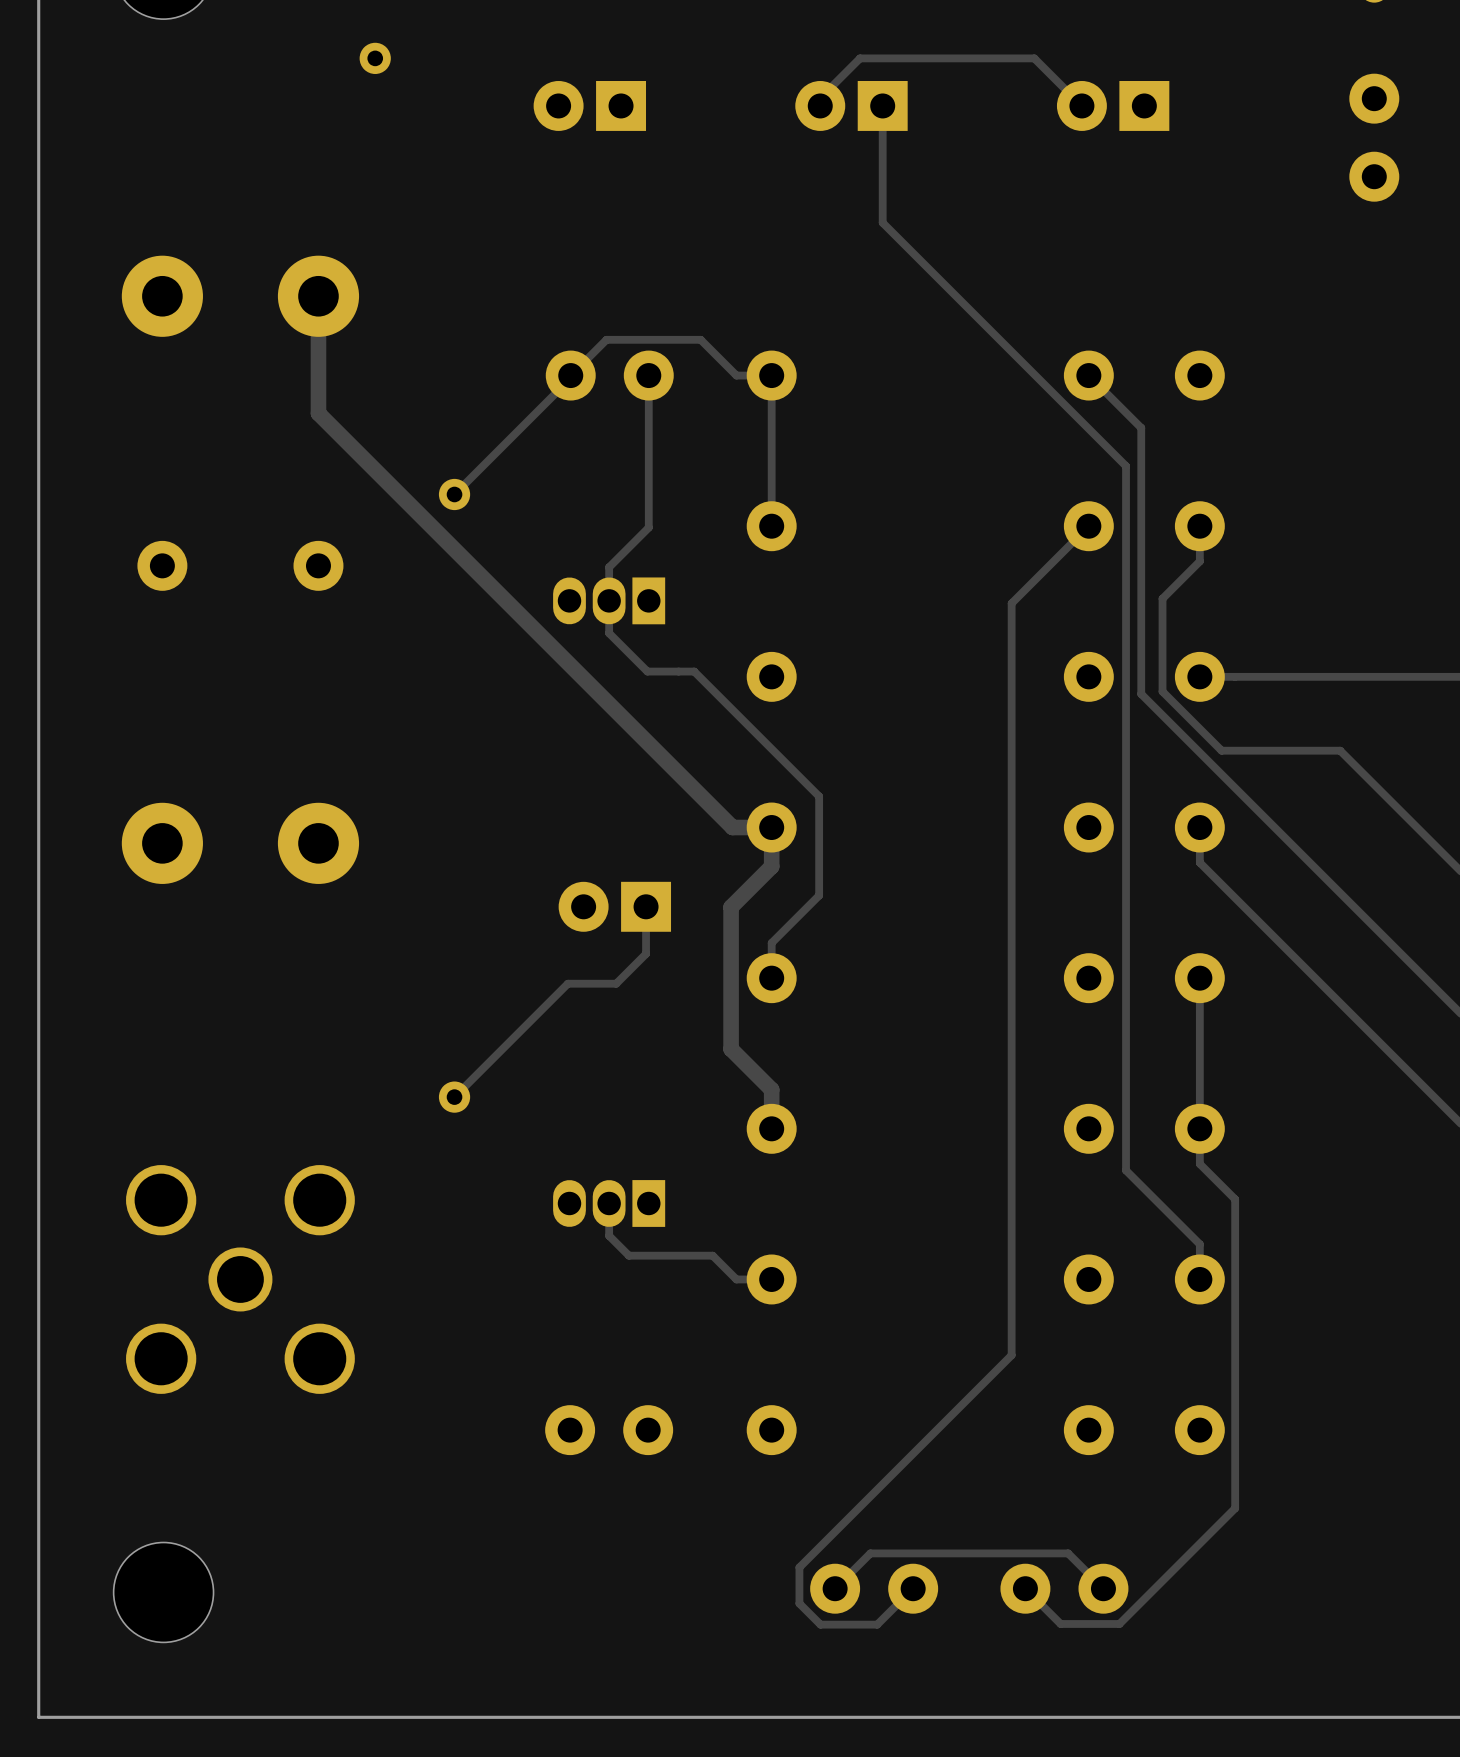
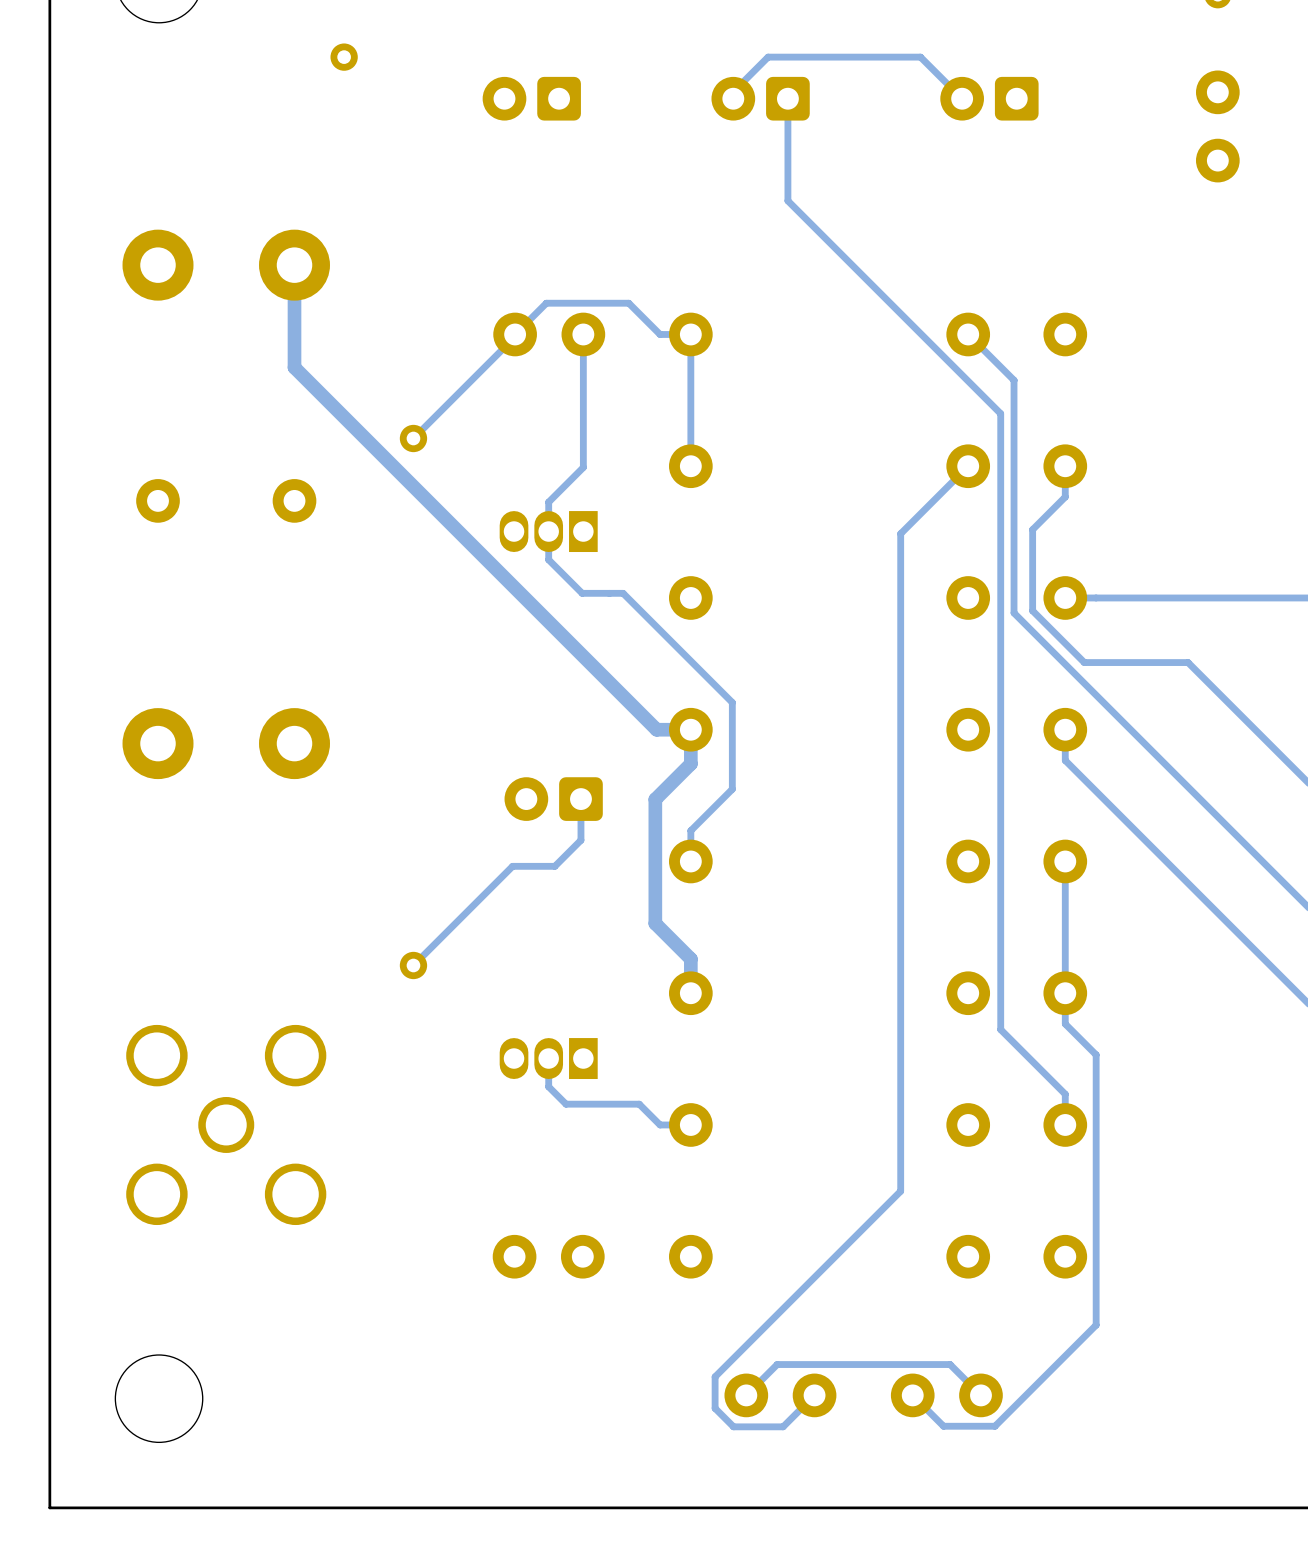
part footprint: [533, 80, 647, 131] -> [482, 76, 581, 121]
part footprint: [795, 80, 908, 131] -> [711, 76, 810, 121]
part footprint: [1056, 80, 1170, 131] -> [940, 76, 1039, 121]
part footprint: [558, 881, 672, 932] -> [504, 777, 603, 821]

